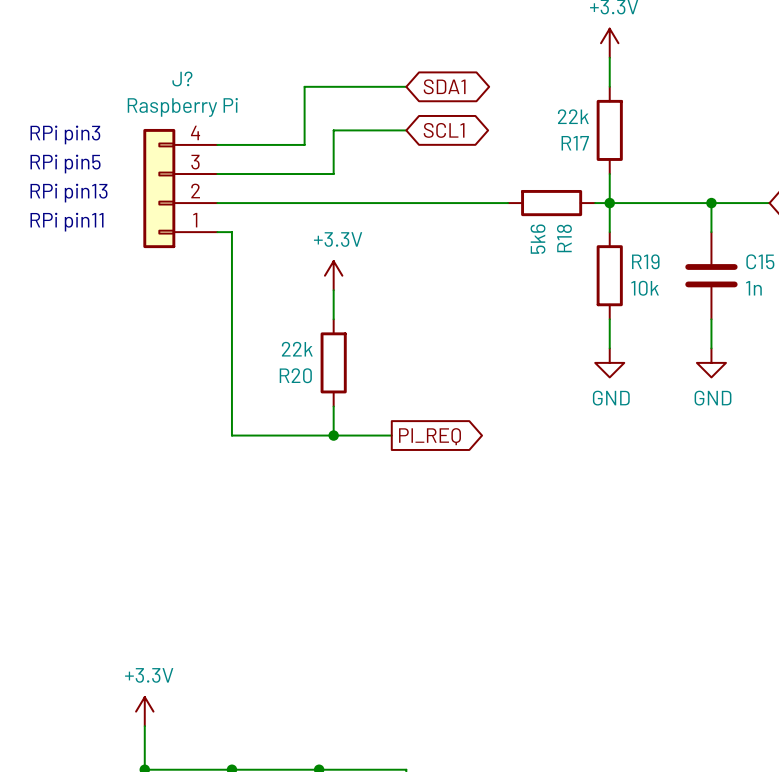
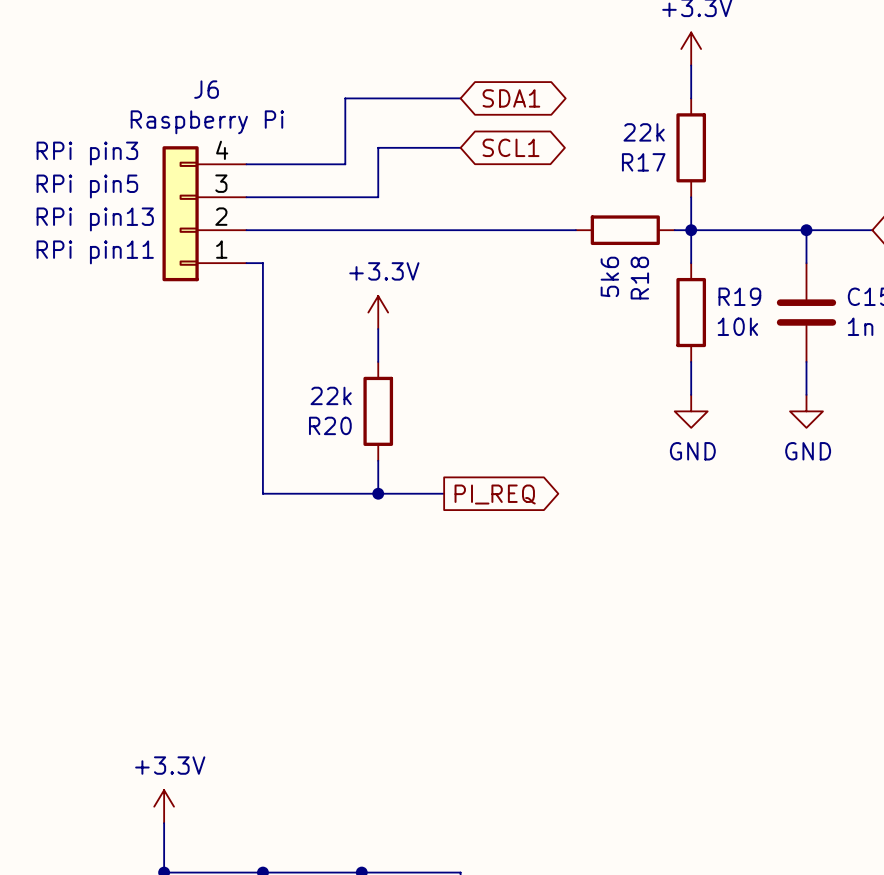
J? name: J? (182, 79) -> J6 (206, 89)

